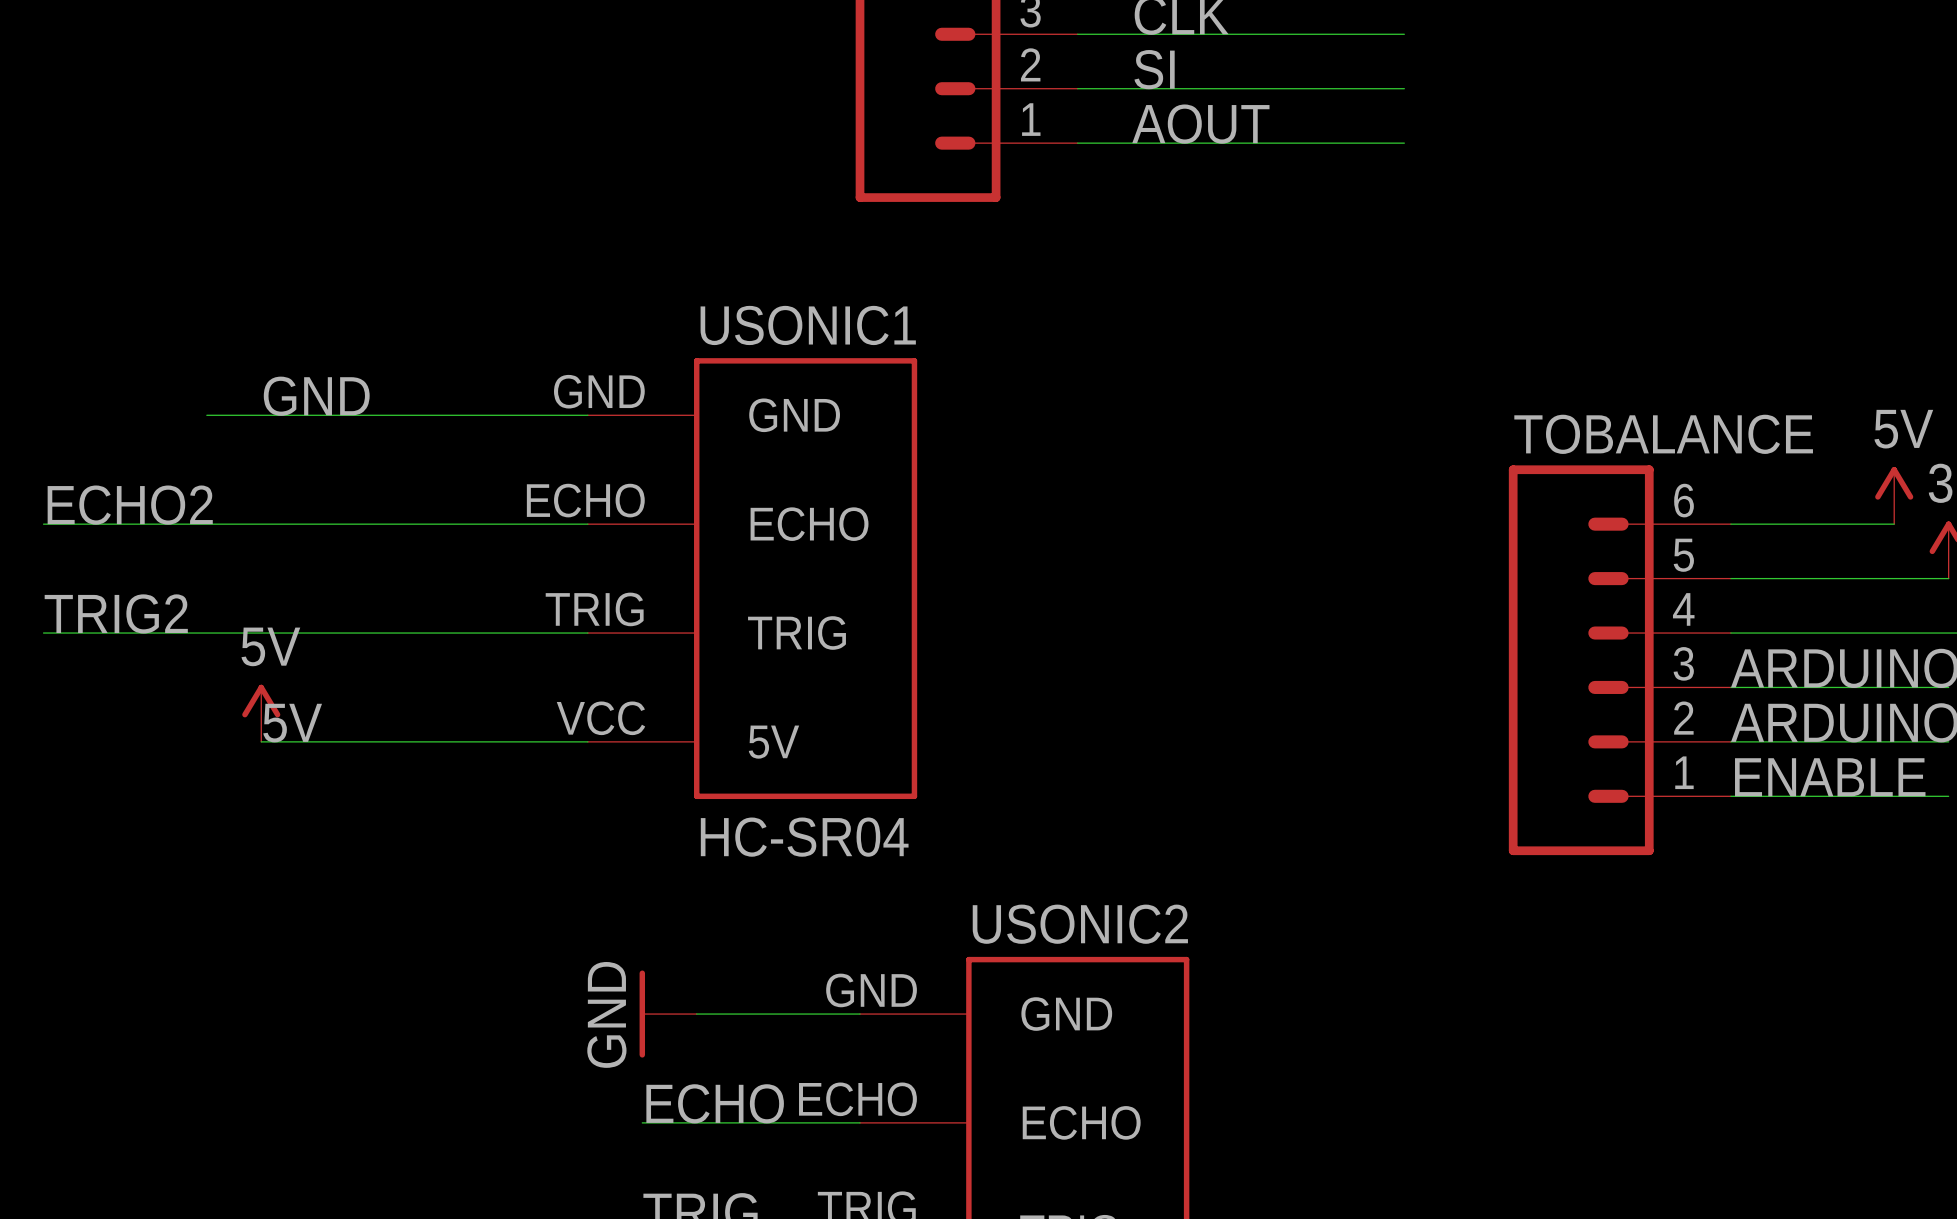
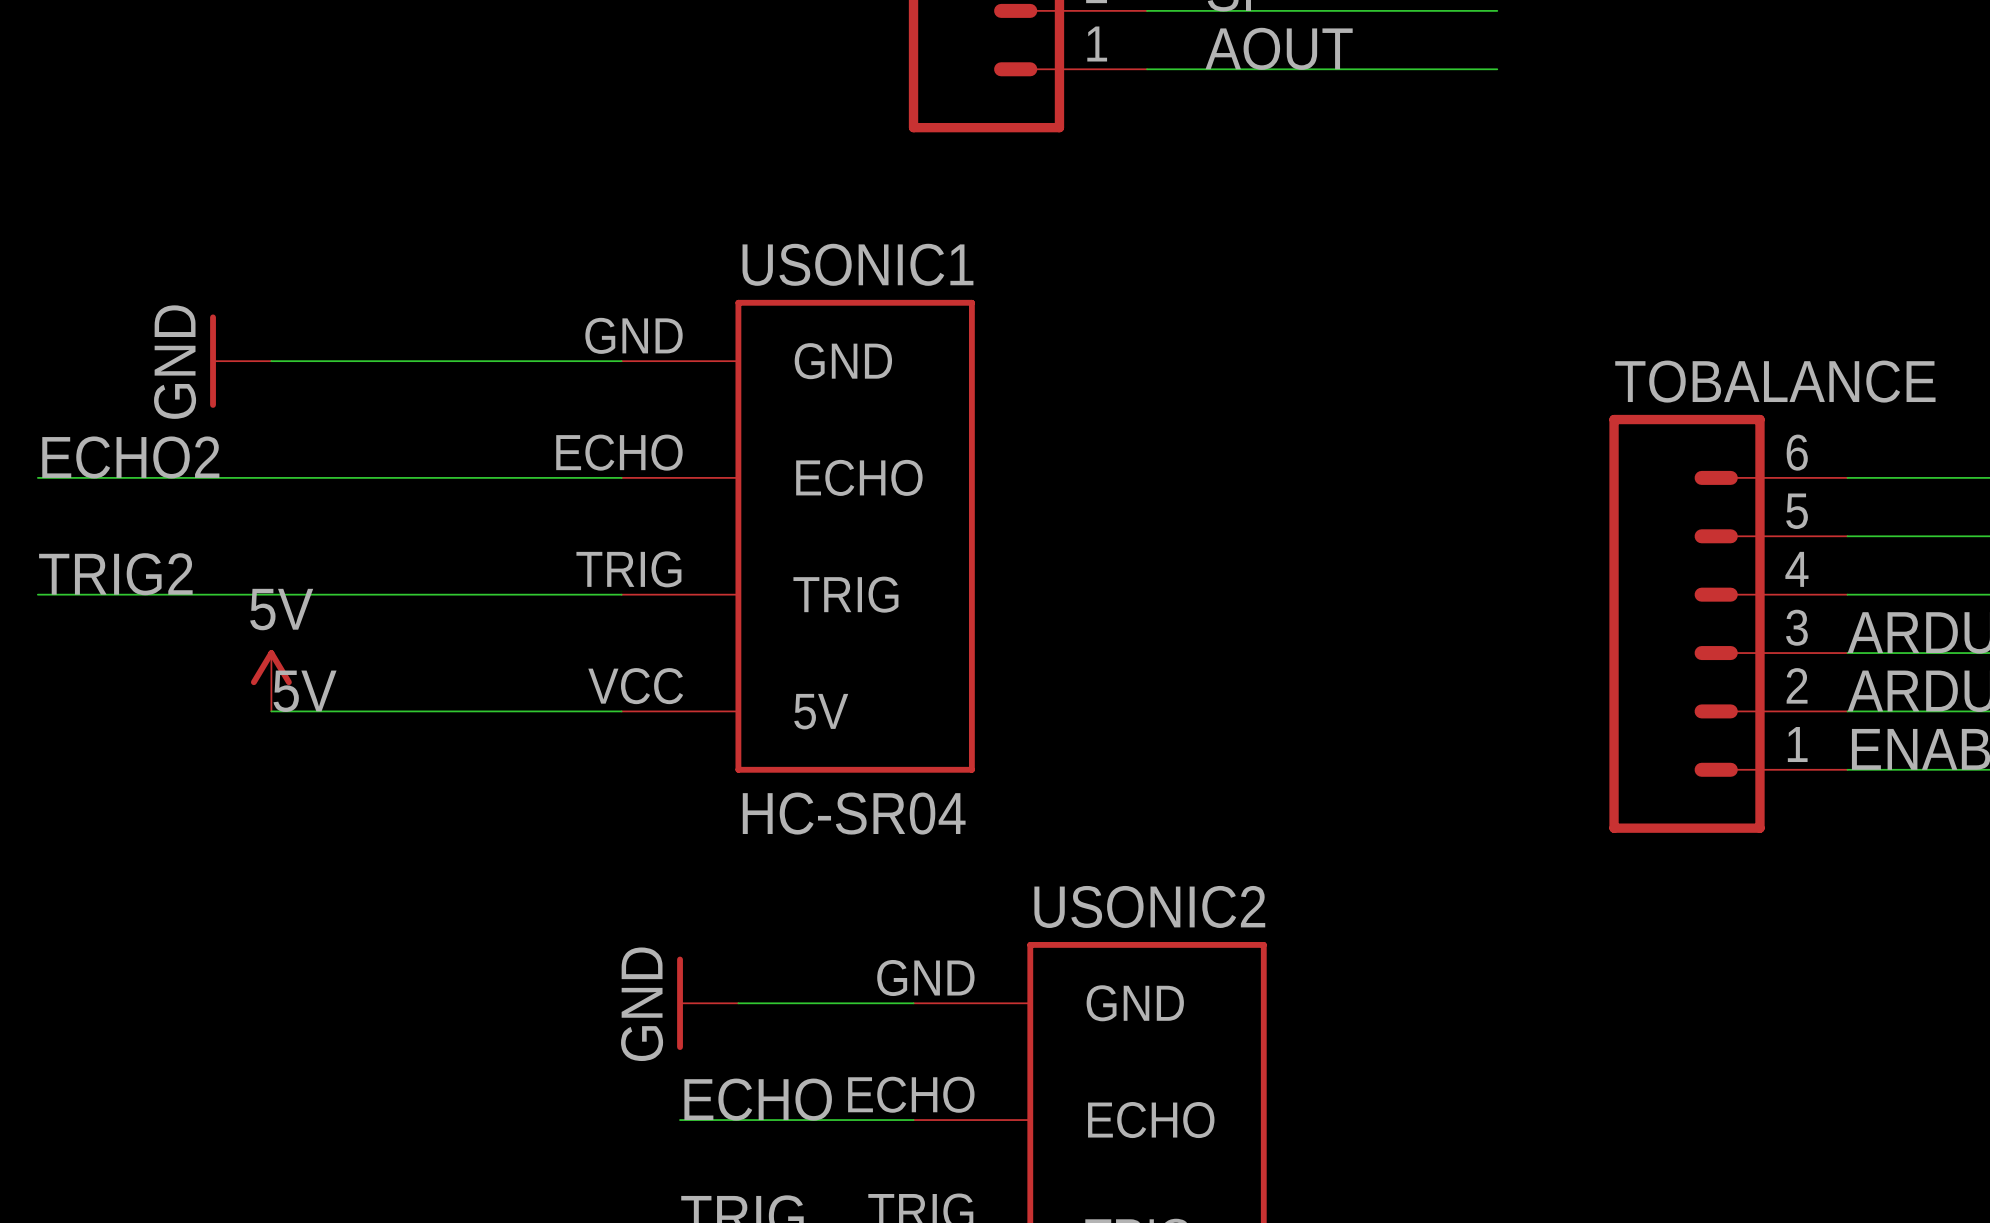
label: GND (316, 396) -> none
power symbol: none -> GND (240, 361)

